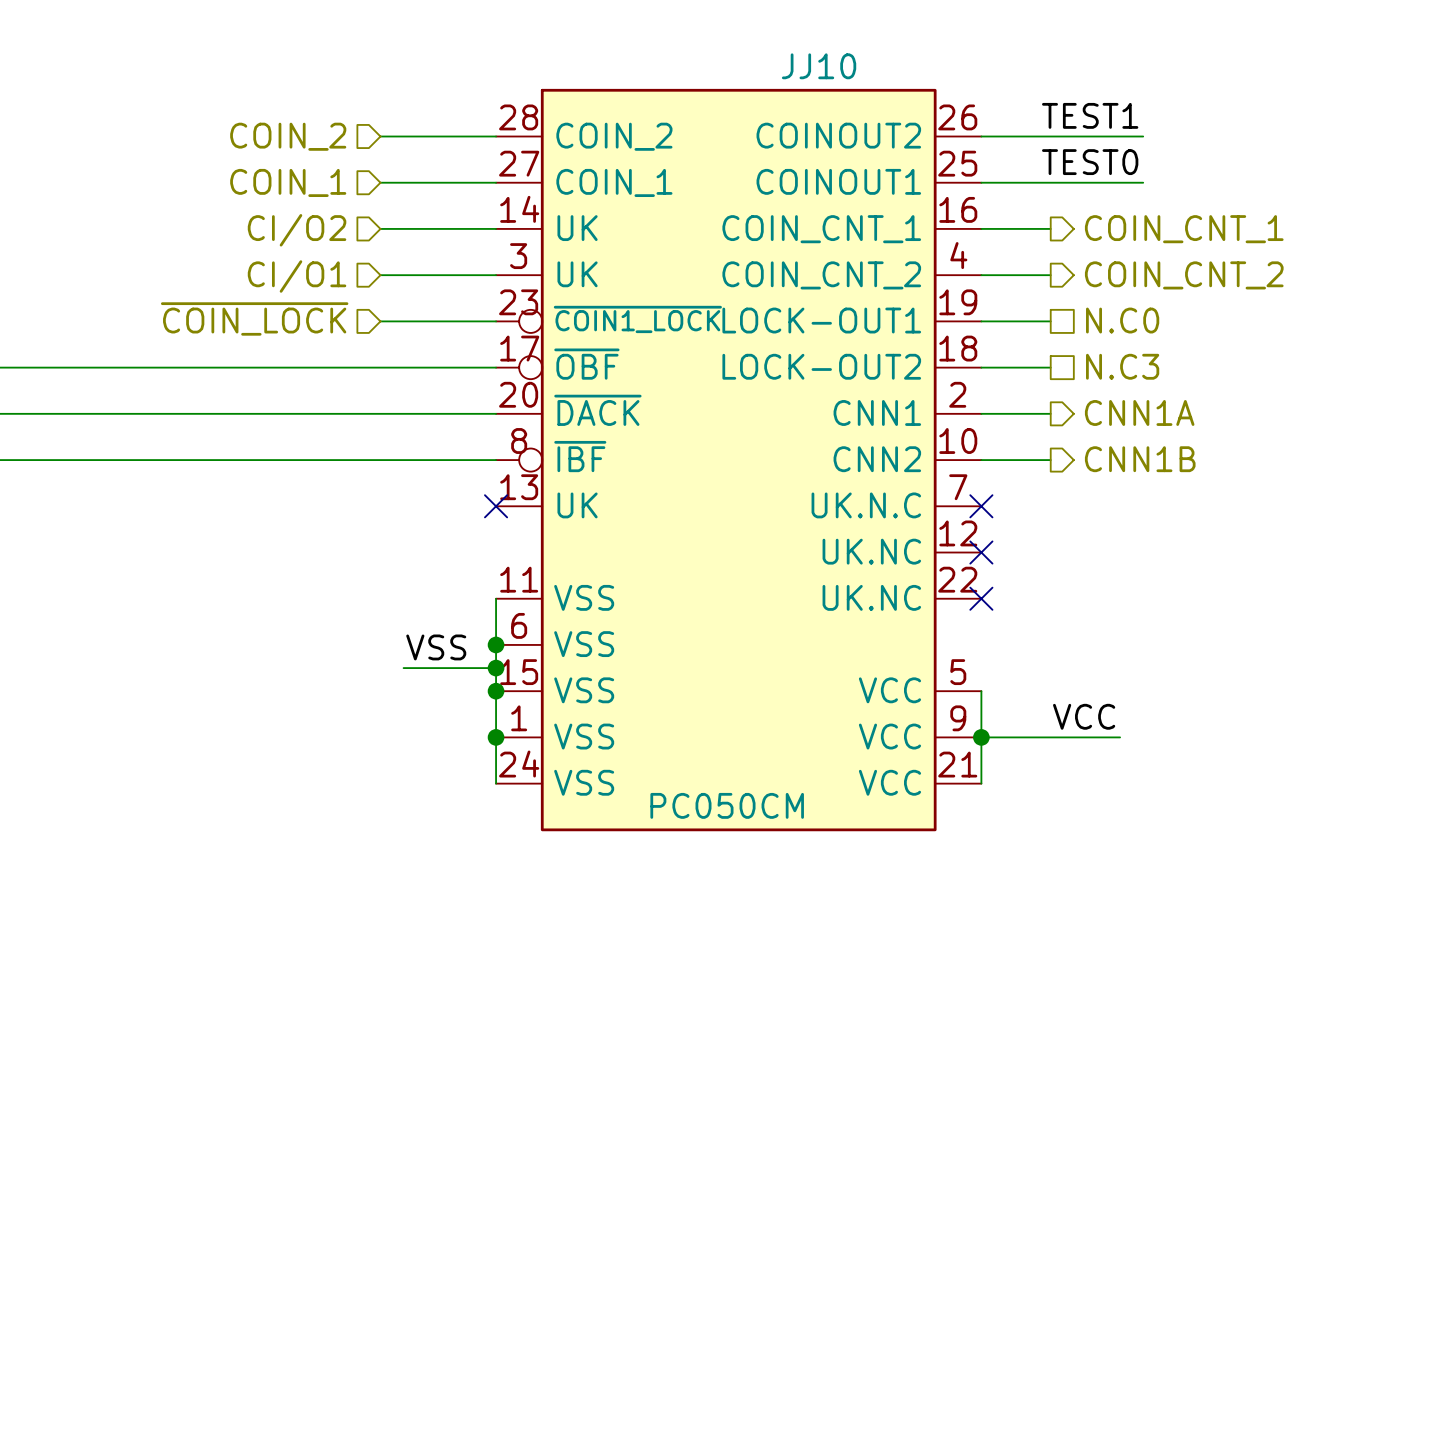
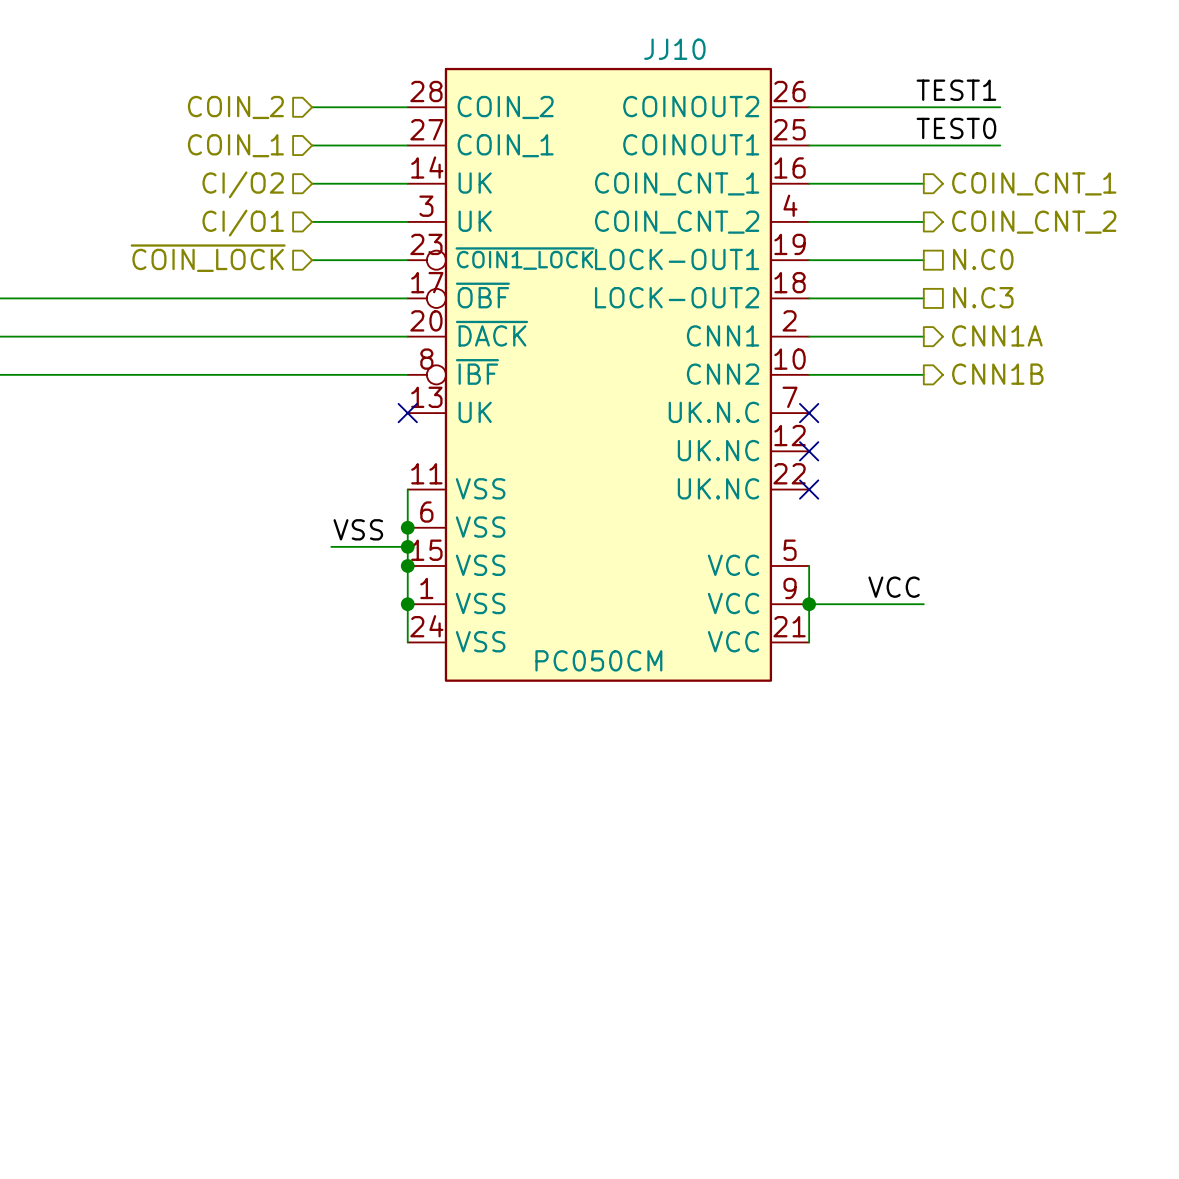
label position: TEST1 (1090, 115) -> TEST1 (956, 90)
wire: none -> (942, 107) (1000, 107)
label position: TEST0 (1090, 162) -> TEST0 (956, 128)
wire: none -> (942, 145) (1000, 145)
wire: none -> (866, 183) (923, 183)
hierarchical label position: COIN_CNT_1 (1184, 229) -> COIN_CNT_1 (1034, 183)
wire: none -> (866, 221) (923, 221)
hierarchical label position: COIN_CNT_2 (1184, 275) -> COIN_CNT_2 (1034, 222)
hierarchical label position: N.C0 (1122, 320) -> N.C0 (983, 259)
wire: none -> (866, 260) (923, 260)
hierarchical label position: N.C3 (1122, 366) -> N.C3 (983, 297)
wire: none -> (866, 298) (923, 298)
hierarchical label position: CNN1A (1139, 412) -> CNN1A (997, 335)
wire: none -> (866, 336) (923, 336)
hierarchical label position: CNN1B (1140, 459) -> CNN1B (997, 374)
wire: none -> (866, 374) (923, 374)

